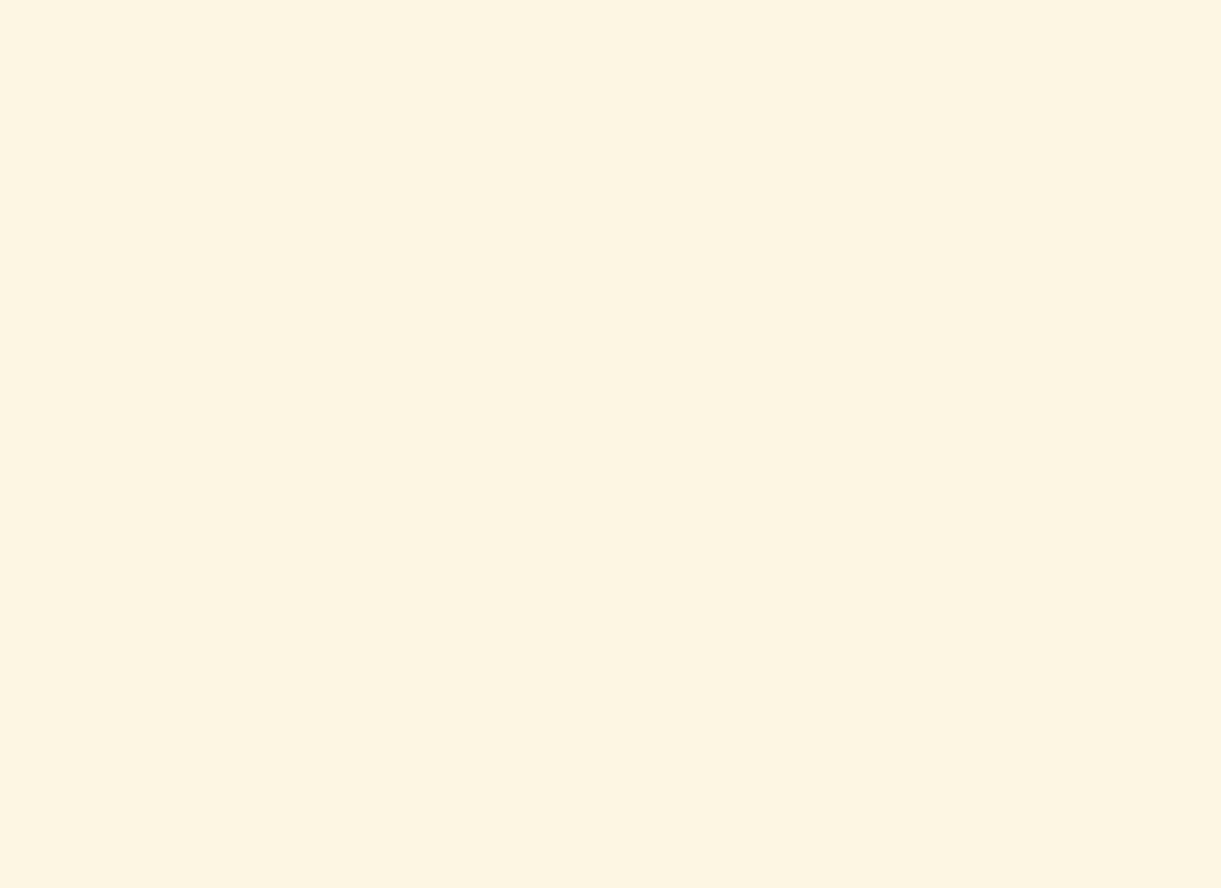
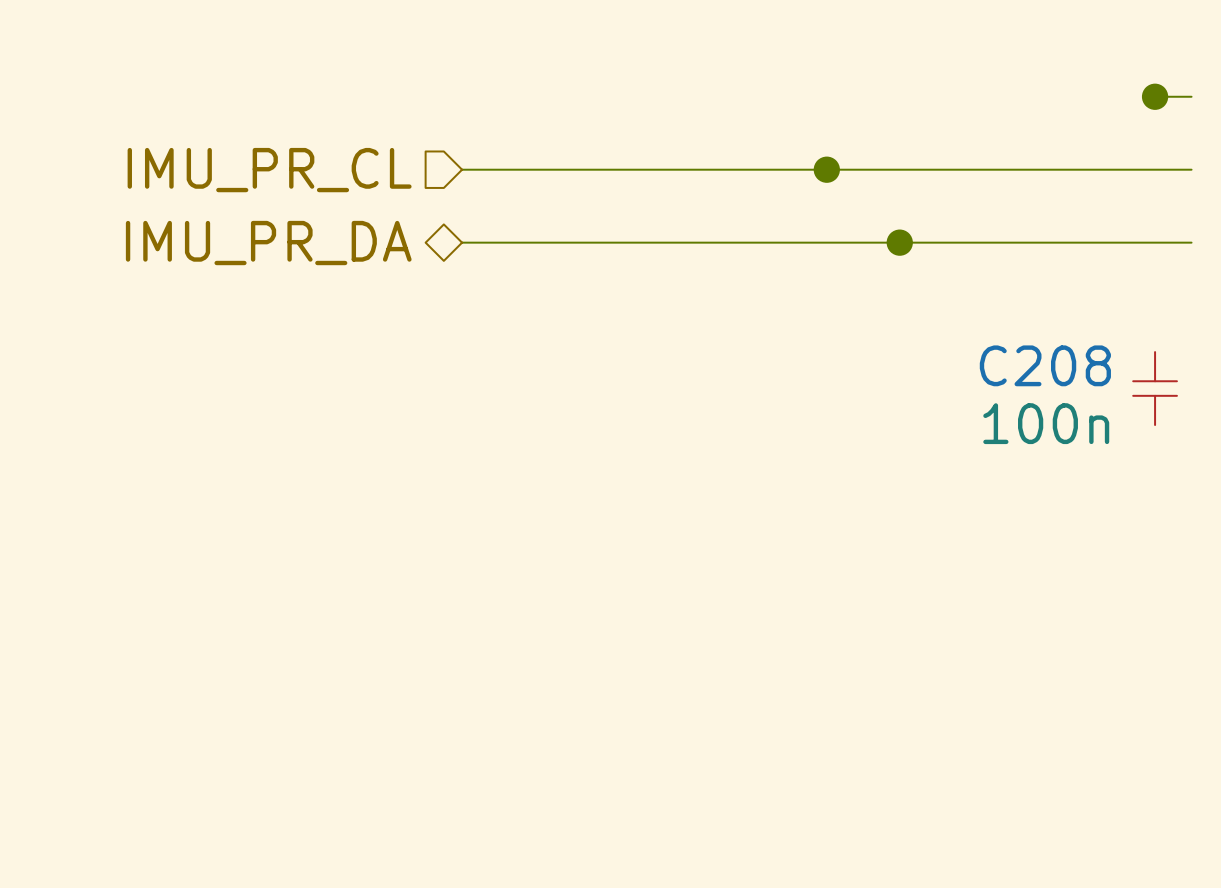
wire: none -> (1155, 96) (1191, 96)
junction: none -> (1155, 96)
wire: none -> (462, 169) (1191, 169)
junction: none -> (826, 169)
hierarchical label: none -> IMU_PR_CL (269, 170)
wire: none -> (462, 242) (1191, 242)
junction: none -> (899, 242)
hierarchical label: none -> IMU_PR_DA (268, 243)
C208: none -> 100n (1155, 388)

